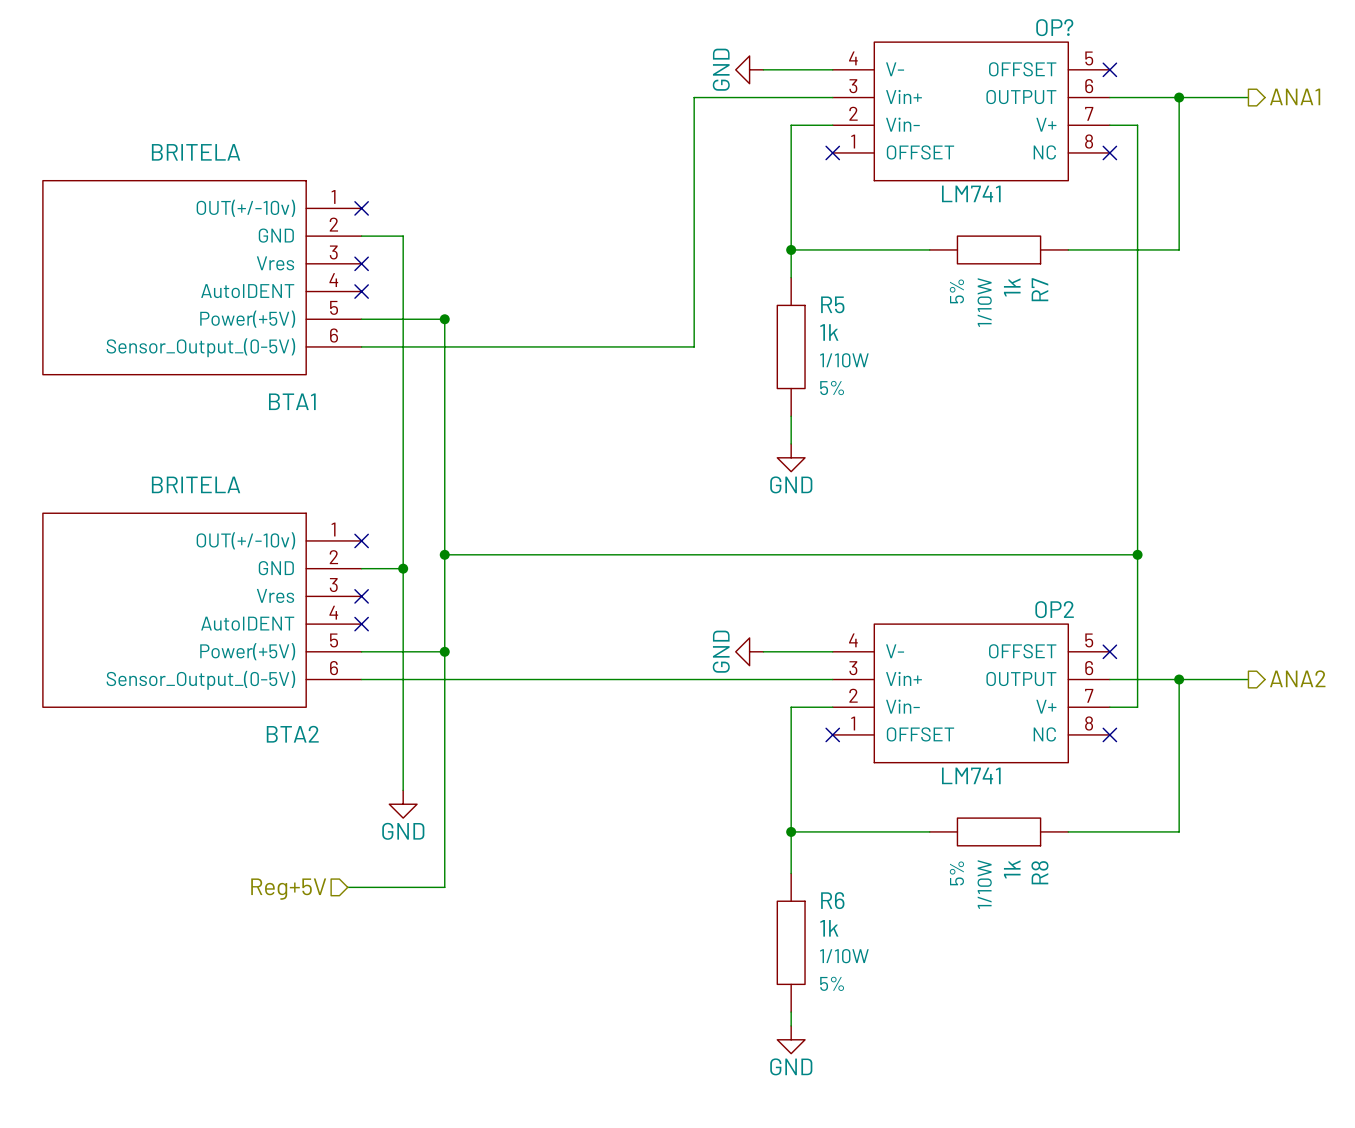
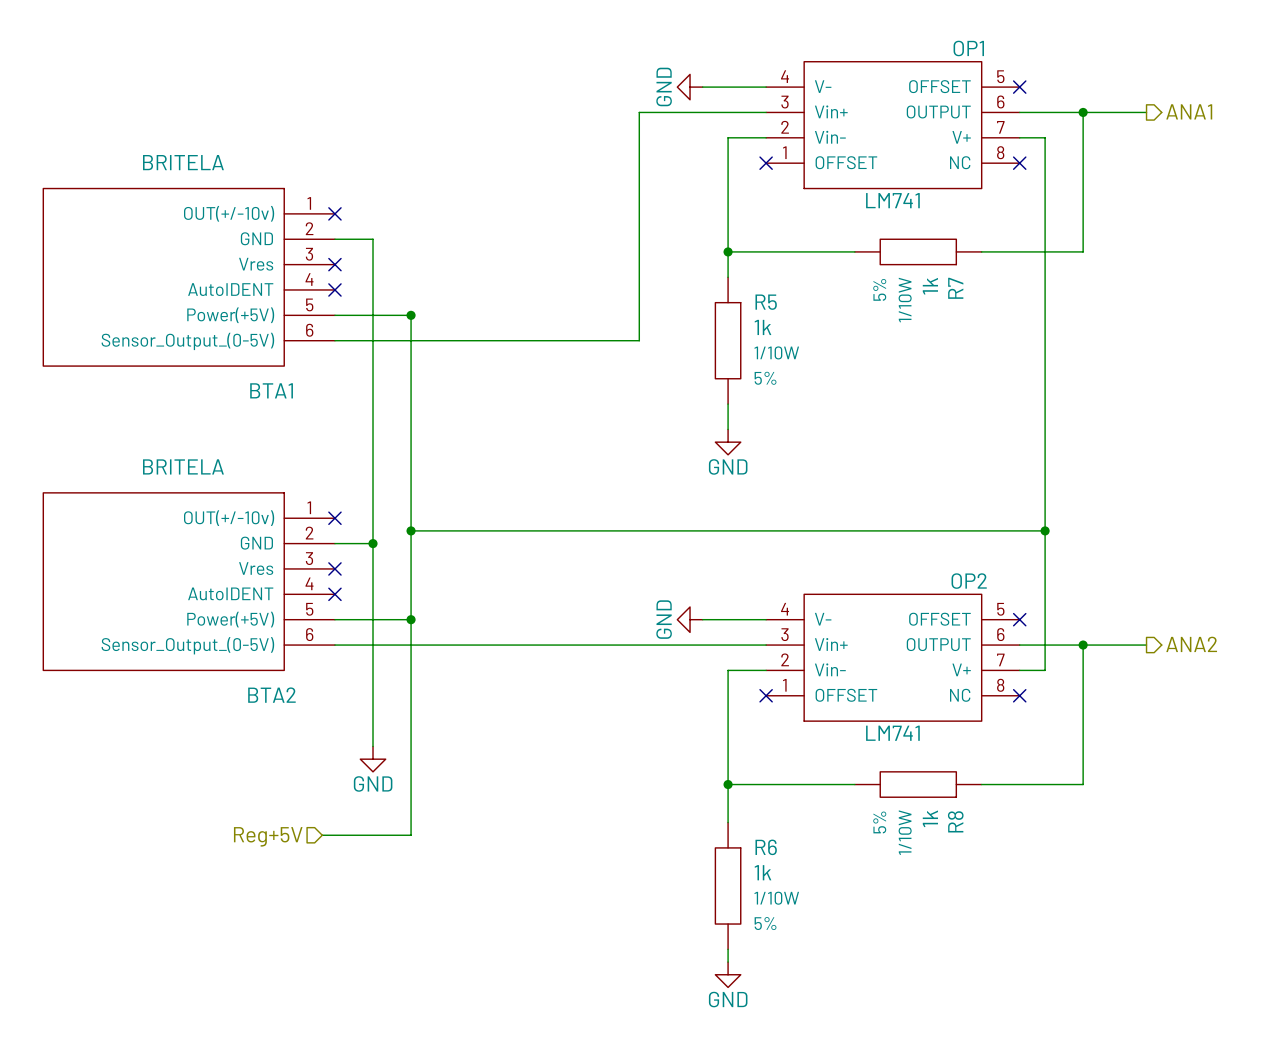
OP? name: OP? (1054, 27) -> OP1 (968, 48)

